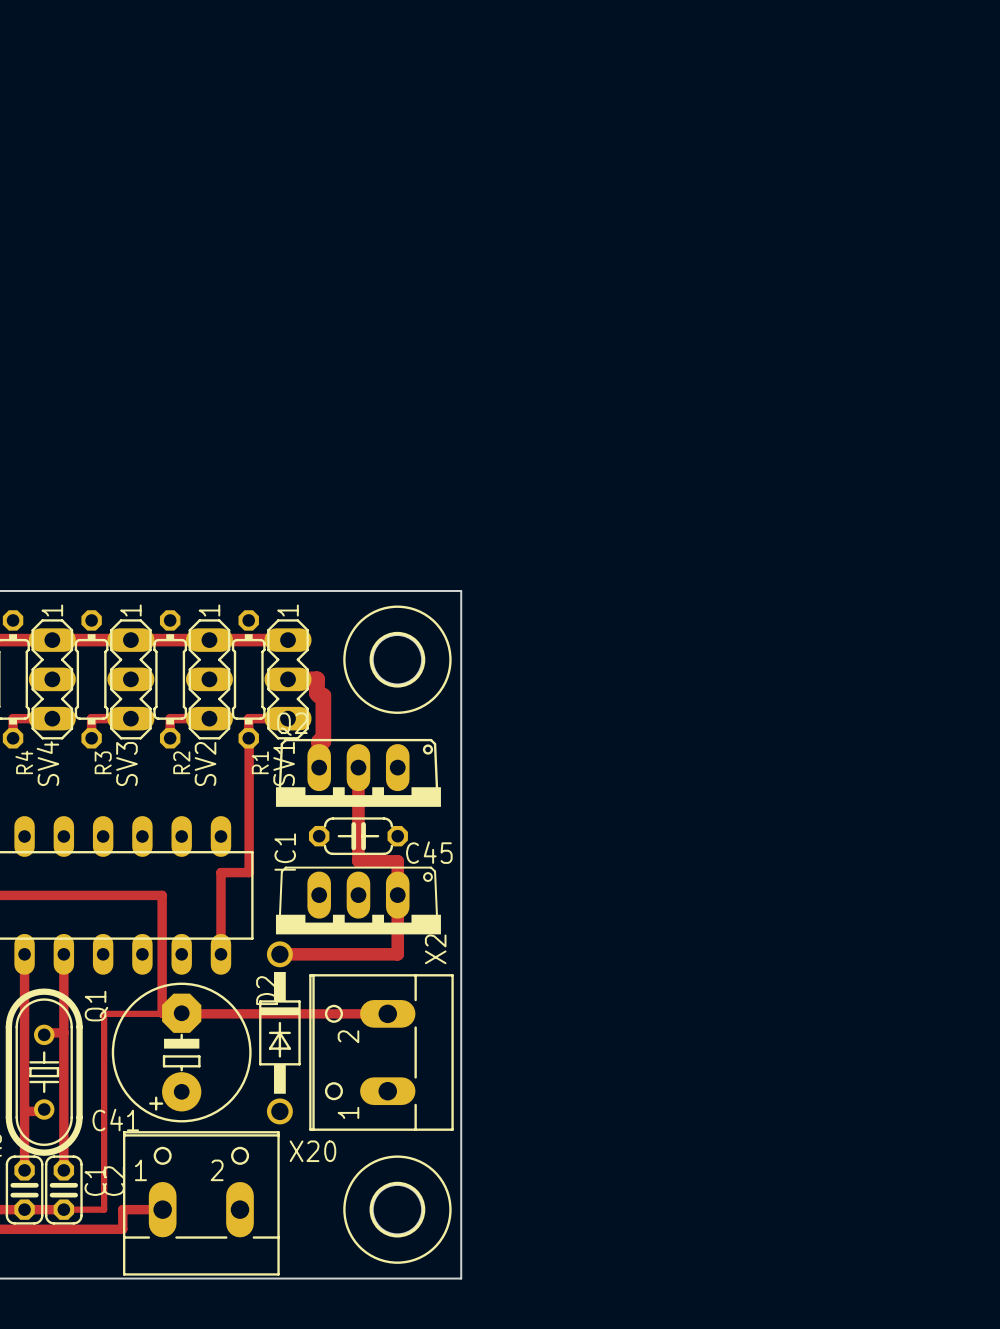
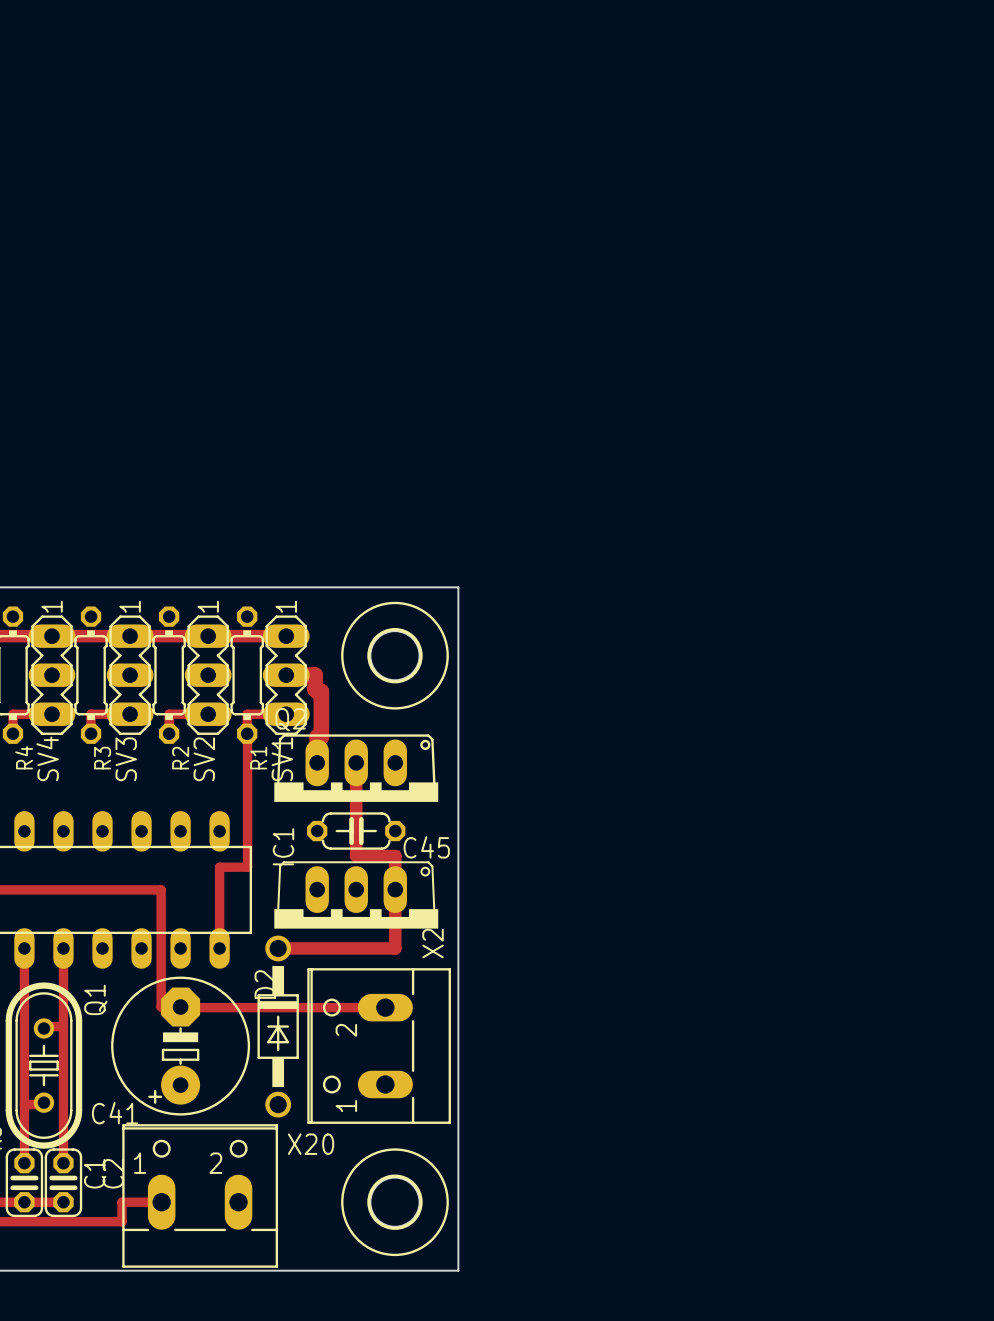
track: (181, 1013) (104, 1013) (104, 1209) (63, 1209) -> none

